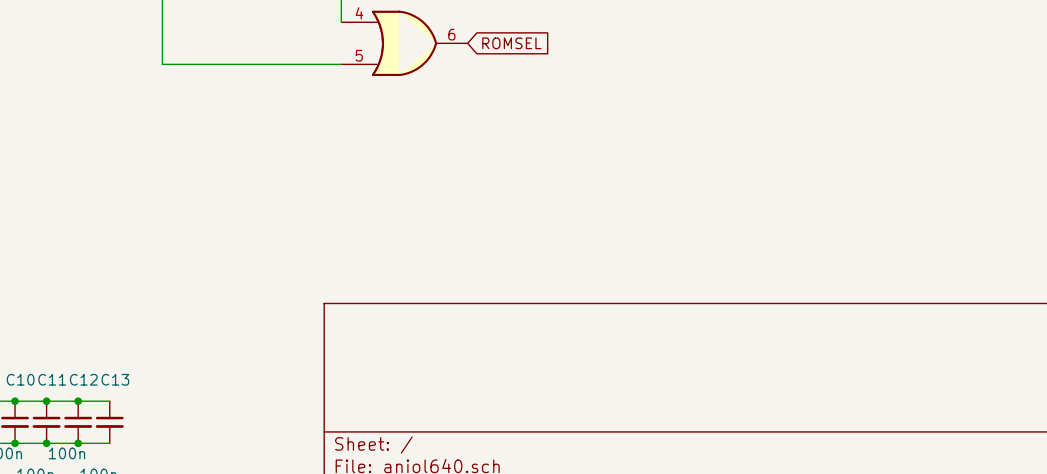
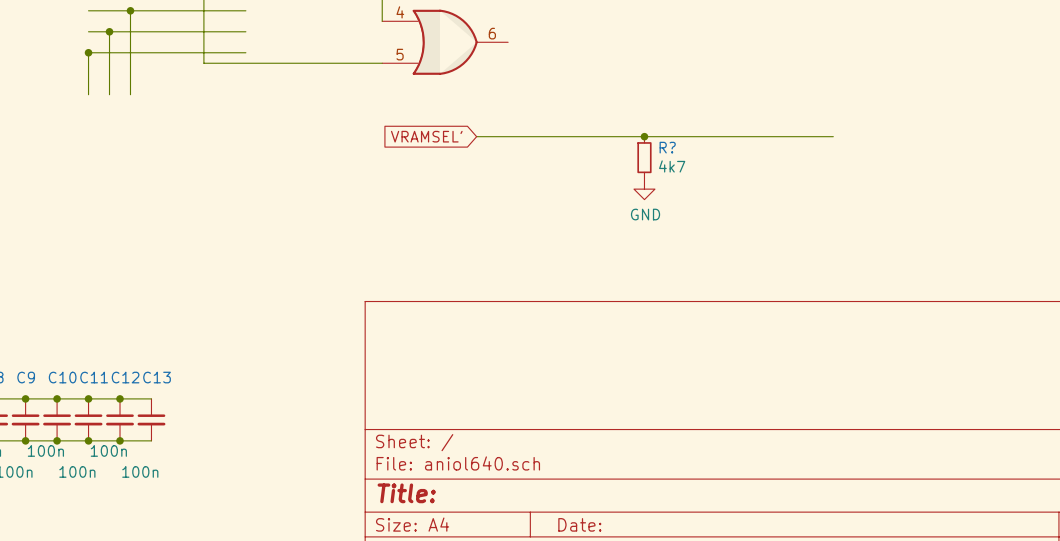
wire: none -> (88, 10) (245, 10)
wire: none -> (130, 10) (130, 94)
junction: none -> (130, 10)
wire: none -> (88, 31) (245, 31)
wire: none -> (109, 31) (109, 94)
junction: none -> (109, 31)
global label: ROMSEL (511, 43) -> none
junction: none -> (88, 52)
wire: none -> (245, 52) (88, 52) (88, 94)
global label: none -> VRAMSEL' (426, 136)
wire: none -> (476, 136) (833, 136)
junction: none -> (644, 136)
R?: none -> 4k7 (644, 157)
power symbol: none -> GND (644, 189)

